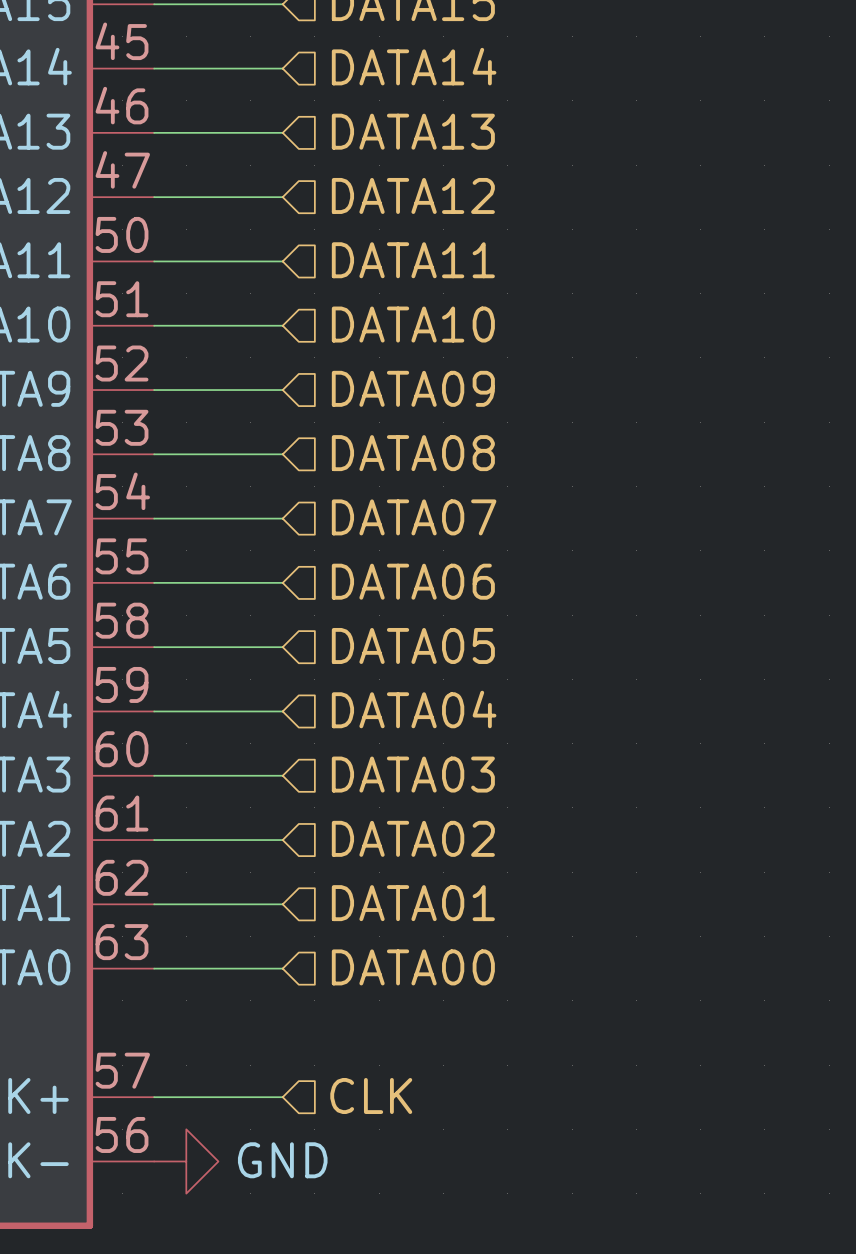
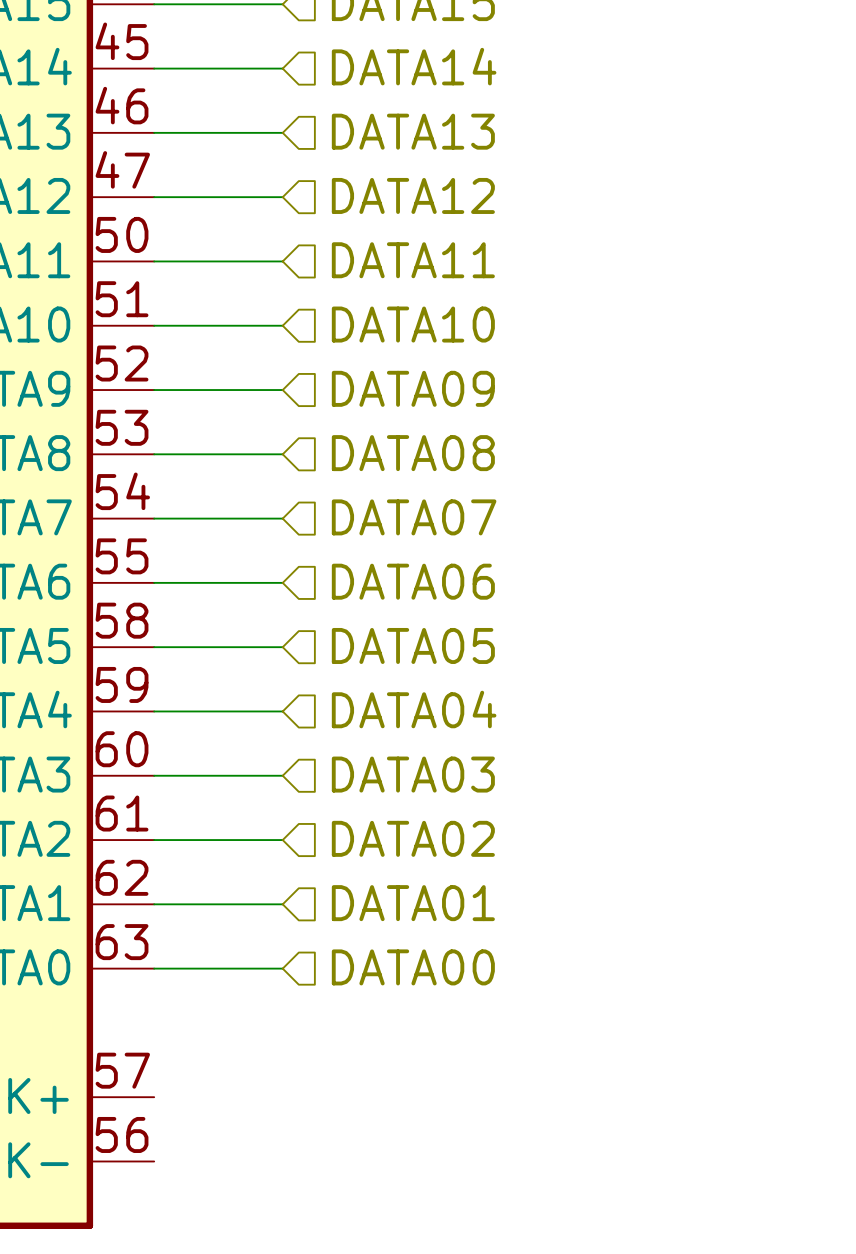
hierarchical label: CLK (371, 1095) -> none
wire: (154, 1097) (282, 1097) -> none
power symbol: GND (186, 1161) -> none

